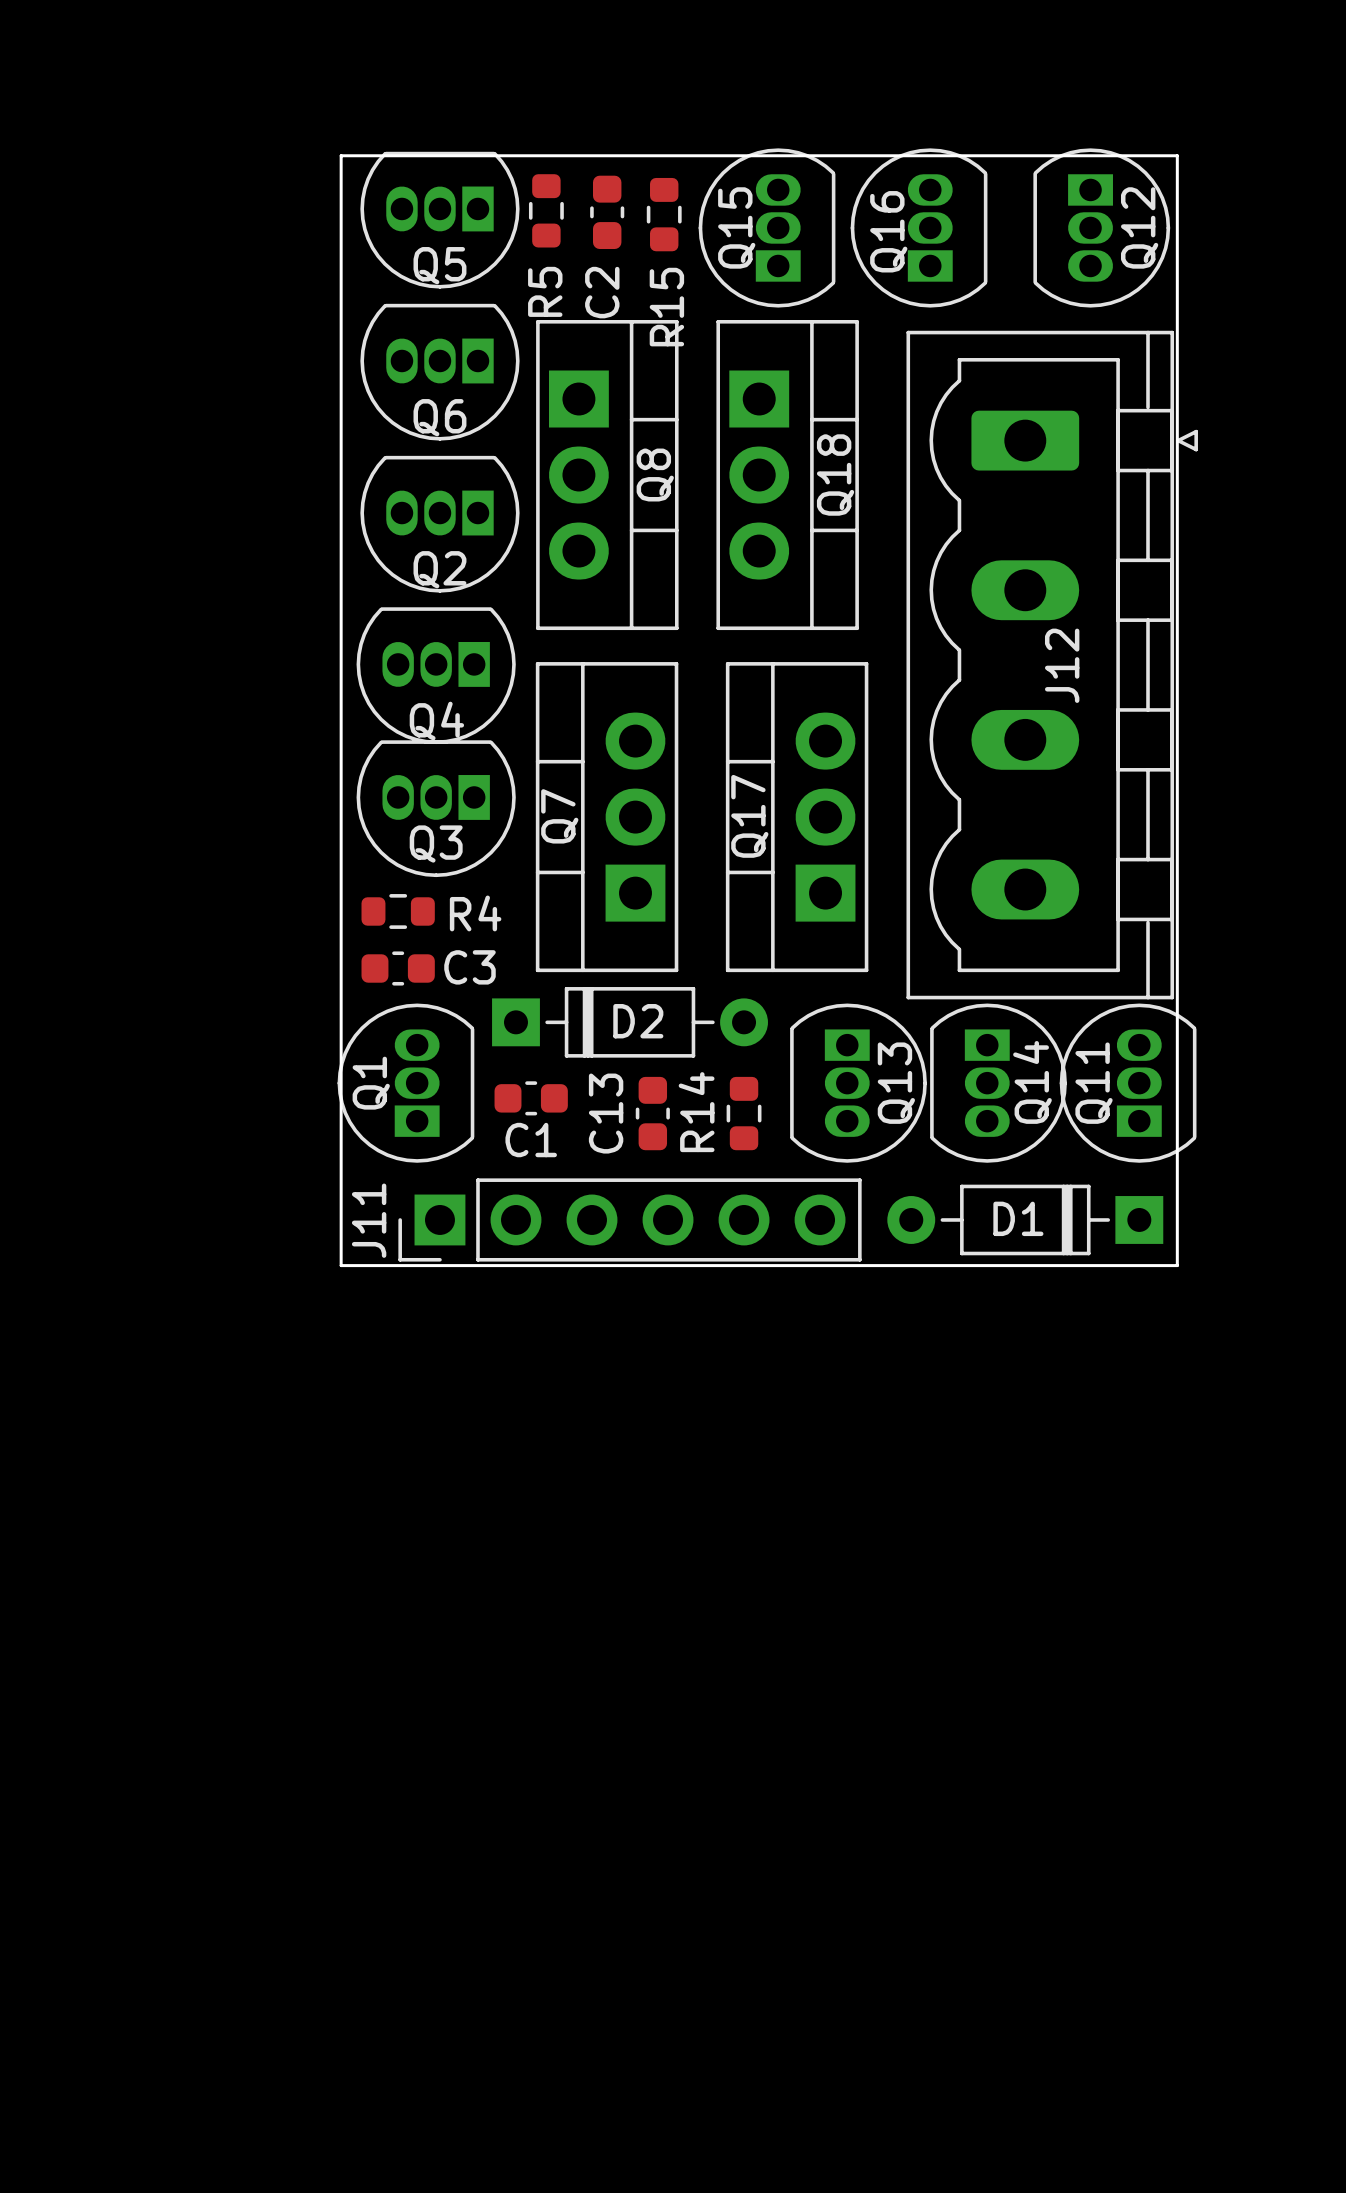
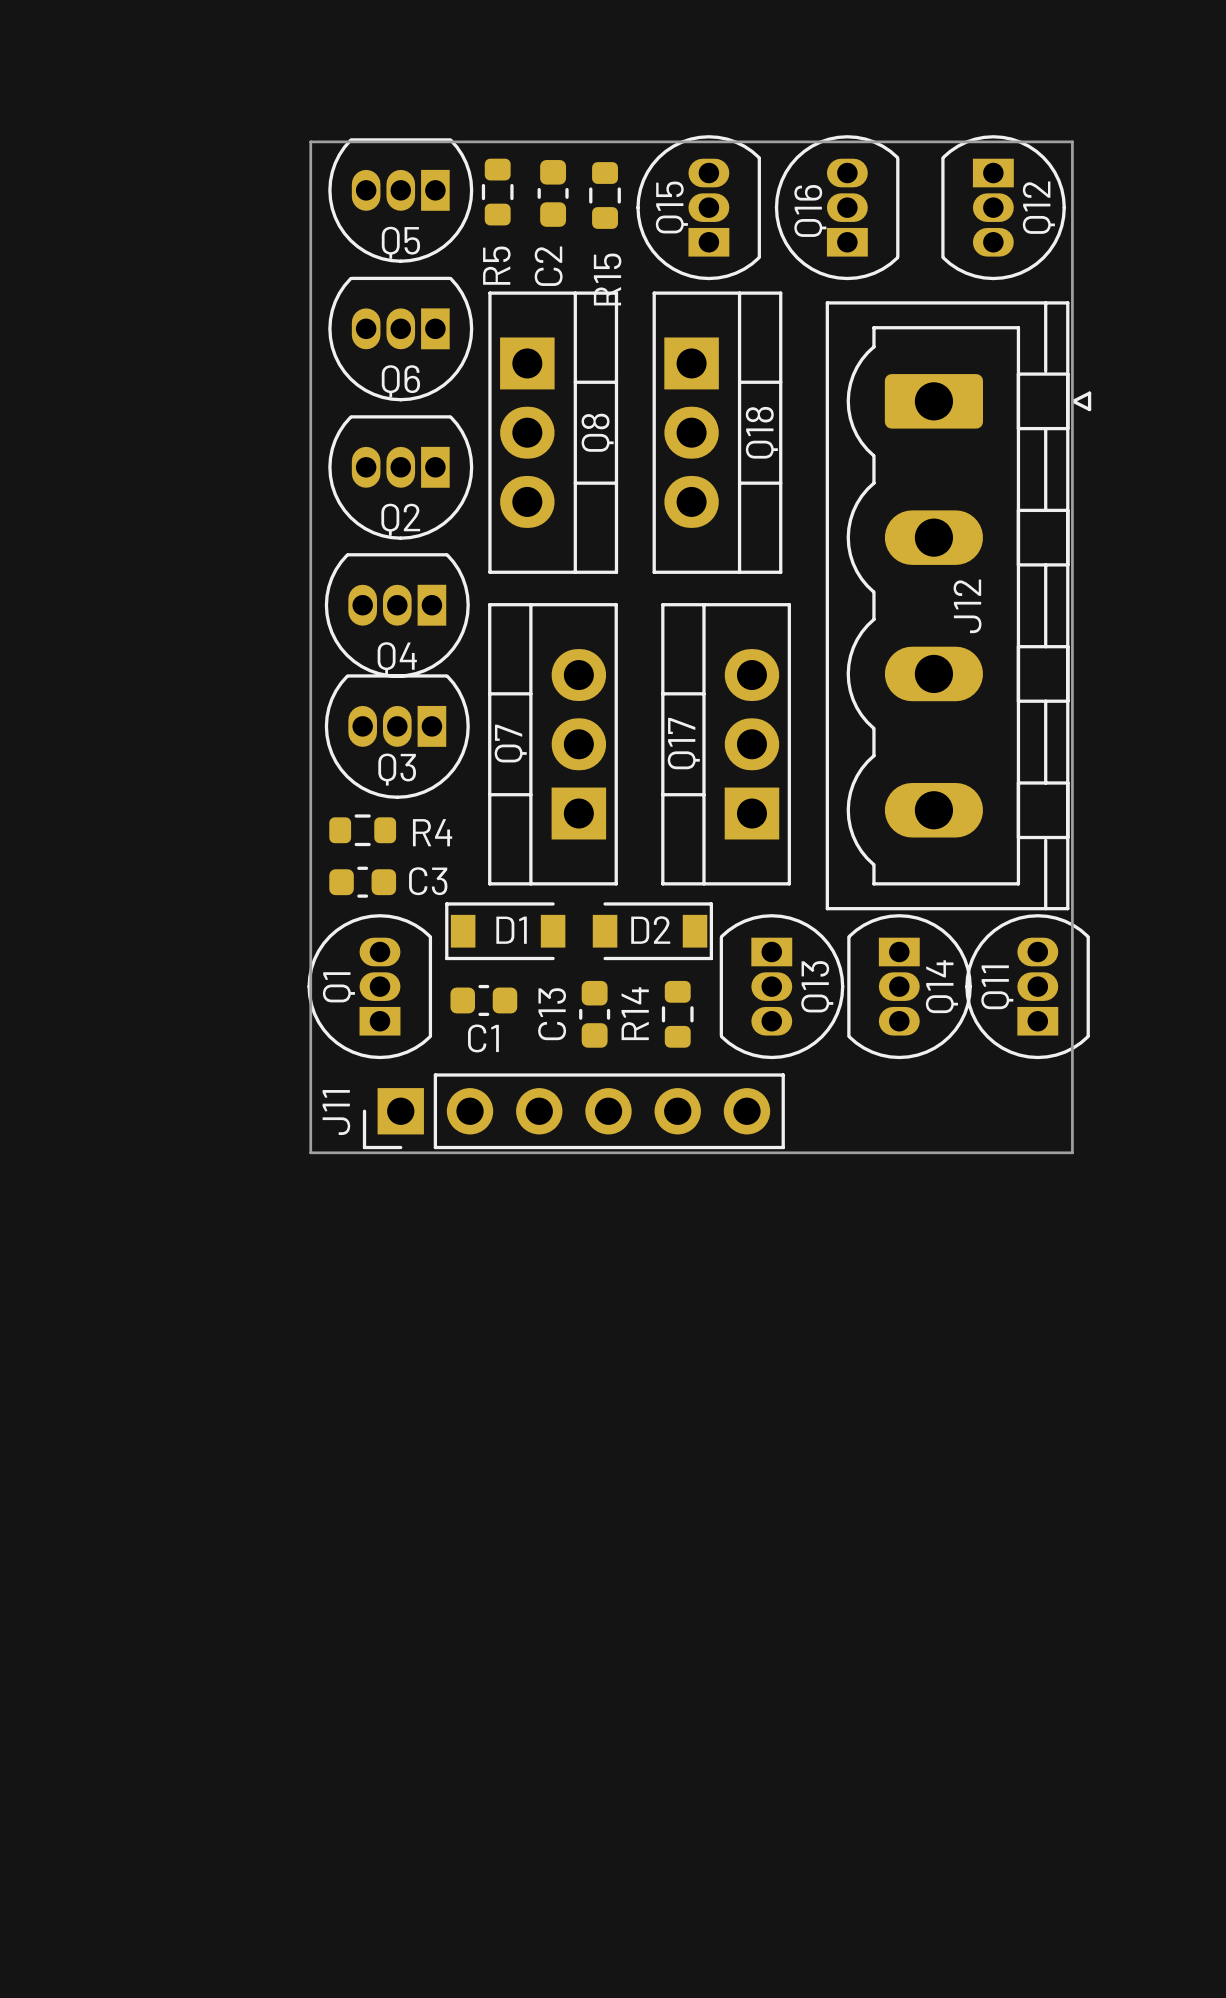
D2 footprint: [492, 987, 768, 1058] -> [592, 902, 714, 961]
D1 footprint: [887, 1184, 1164, 1256] -> [445, 902, 566, 961]

